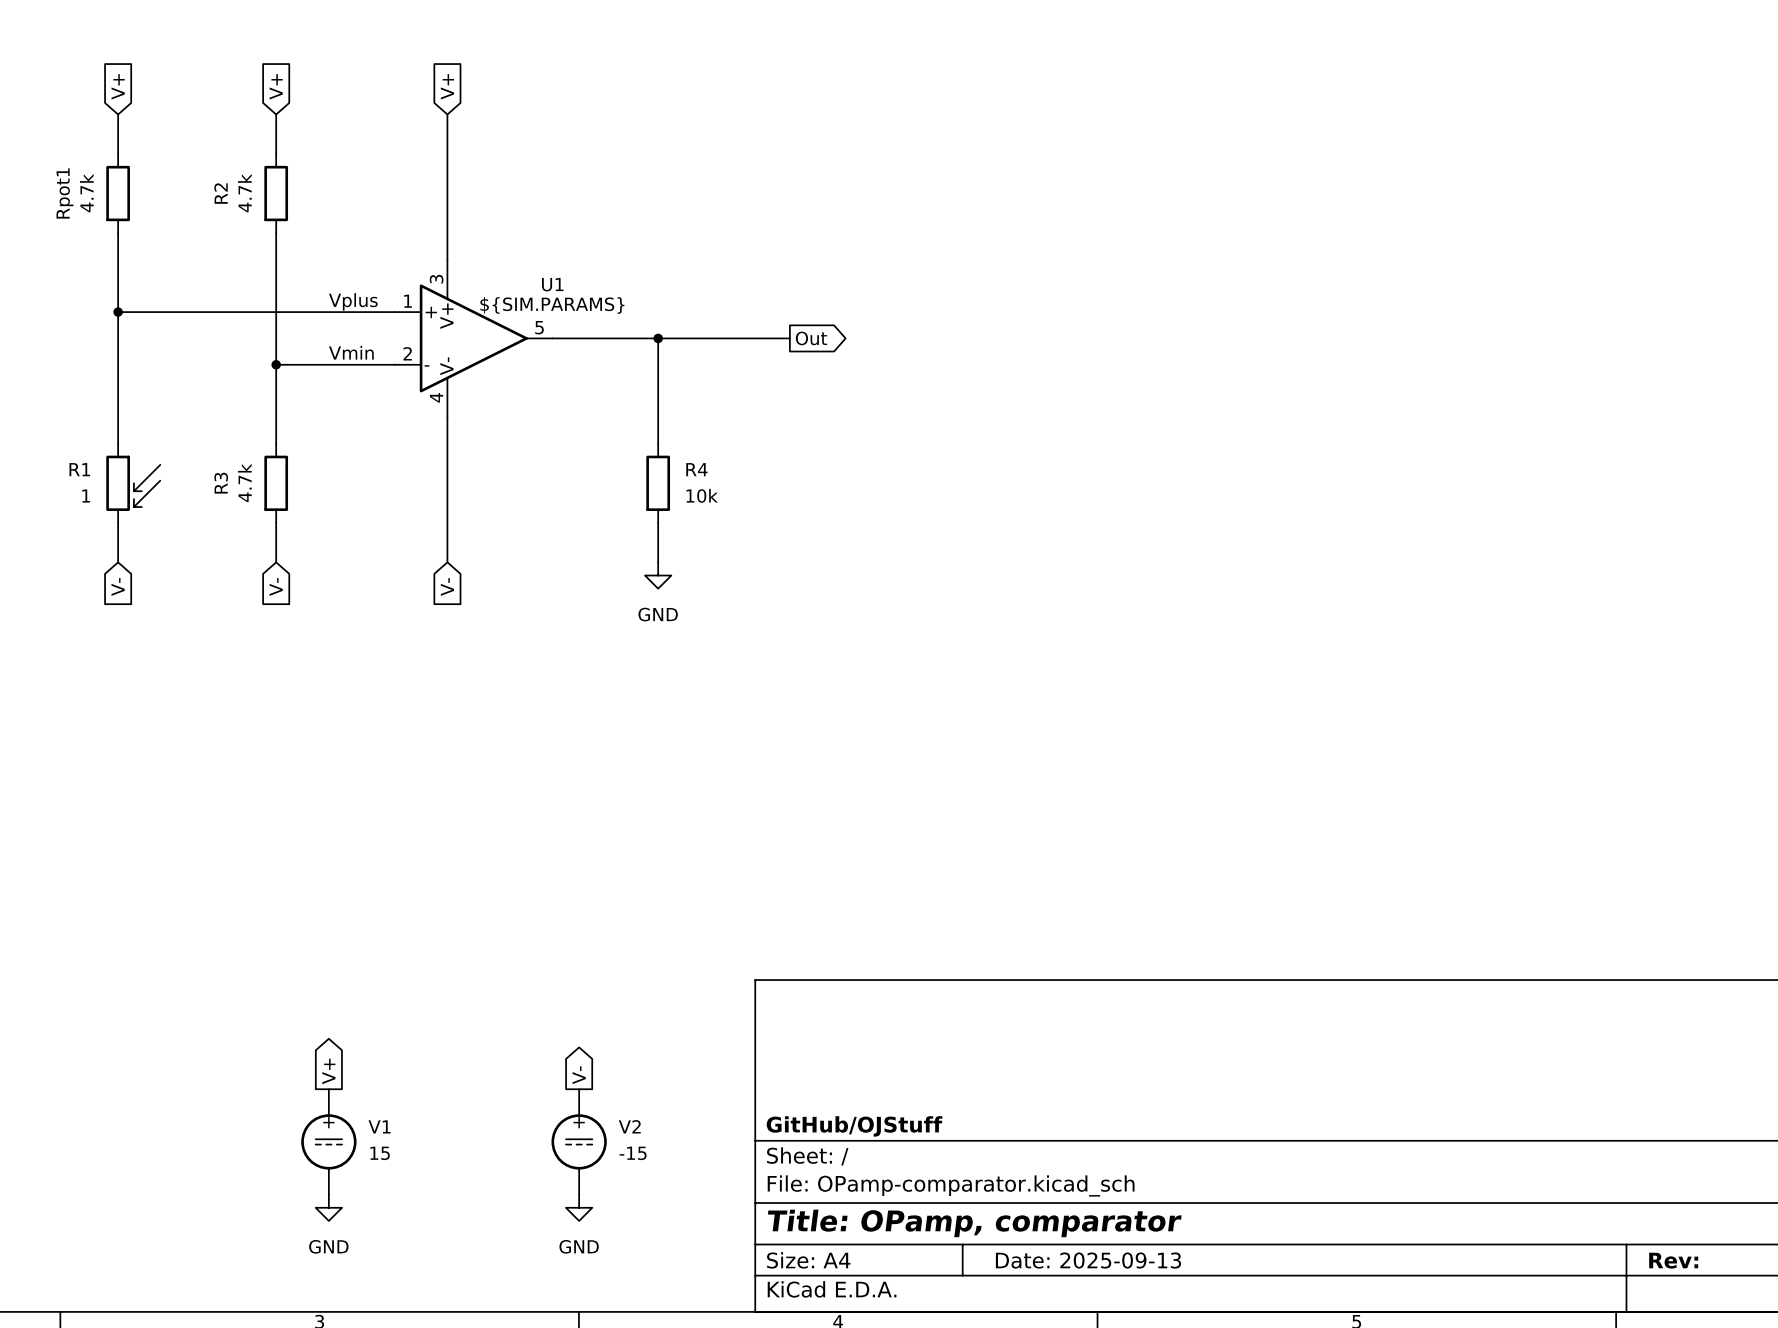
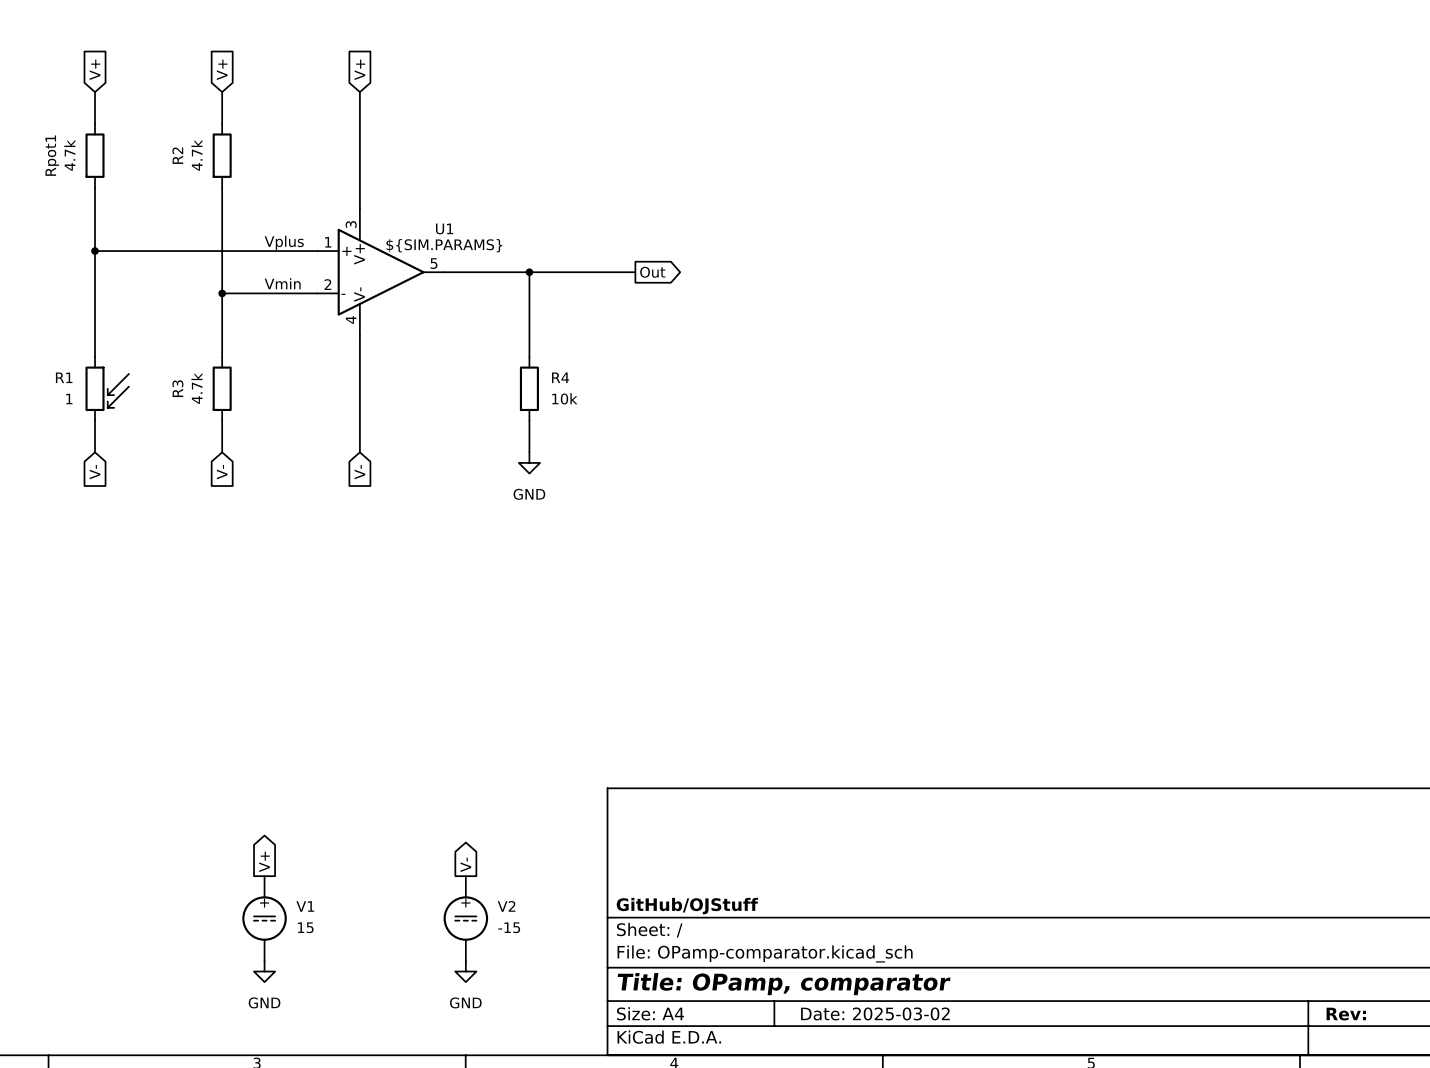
title block: Date: 2025-09-13 (1088, 1260) -> Date: 2025-03-02 (875, 1013)

